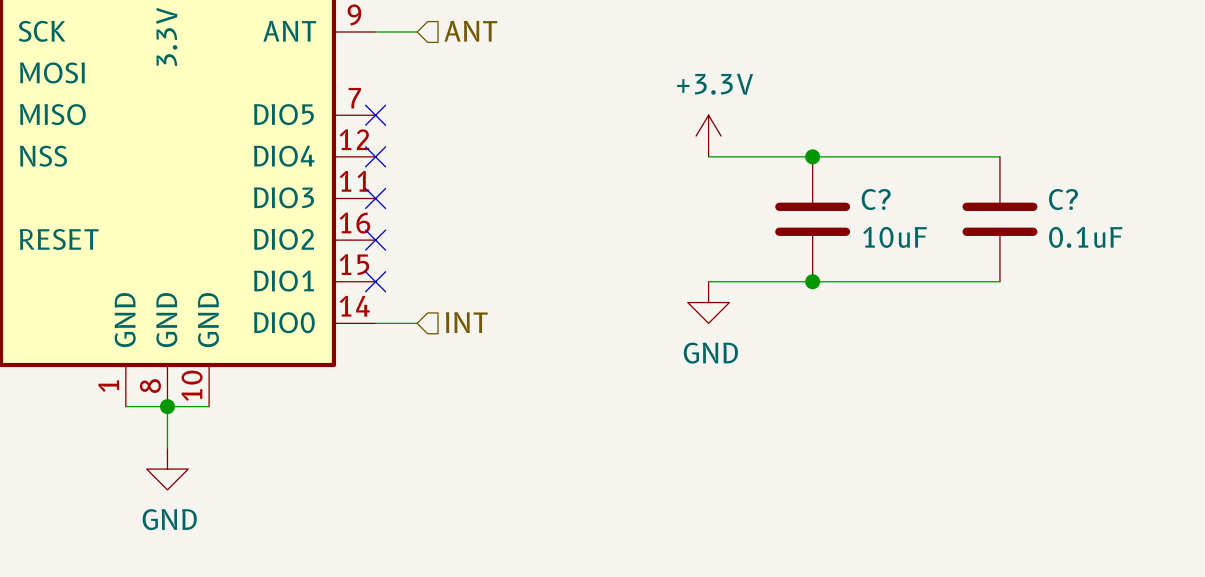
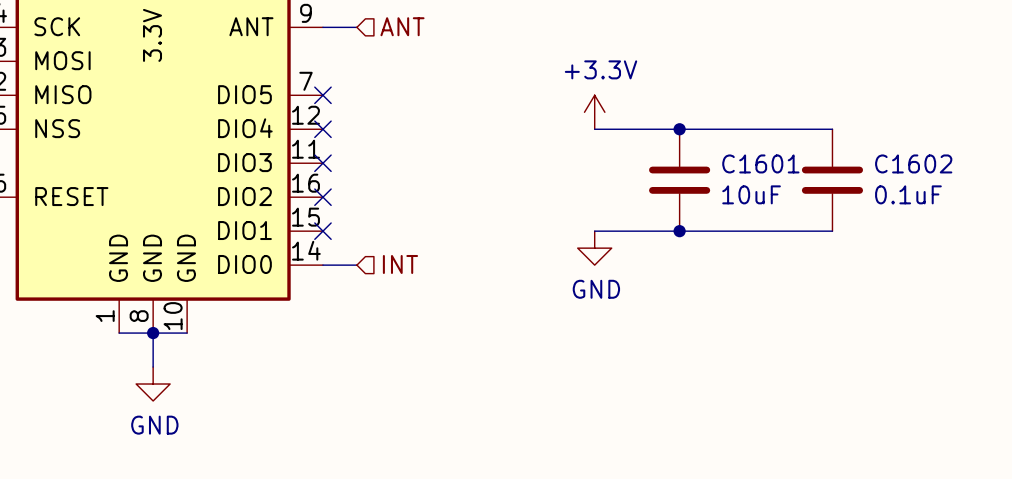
C? name: C? (876, 199) -> C1601 (760, 163)
C? name: C? (1063, 199) -> C1602 (913, 163)

